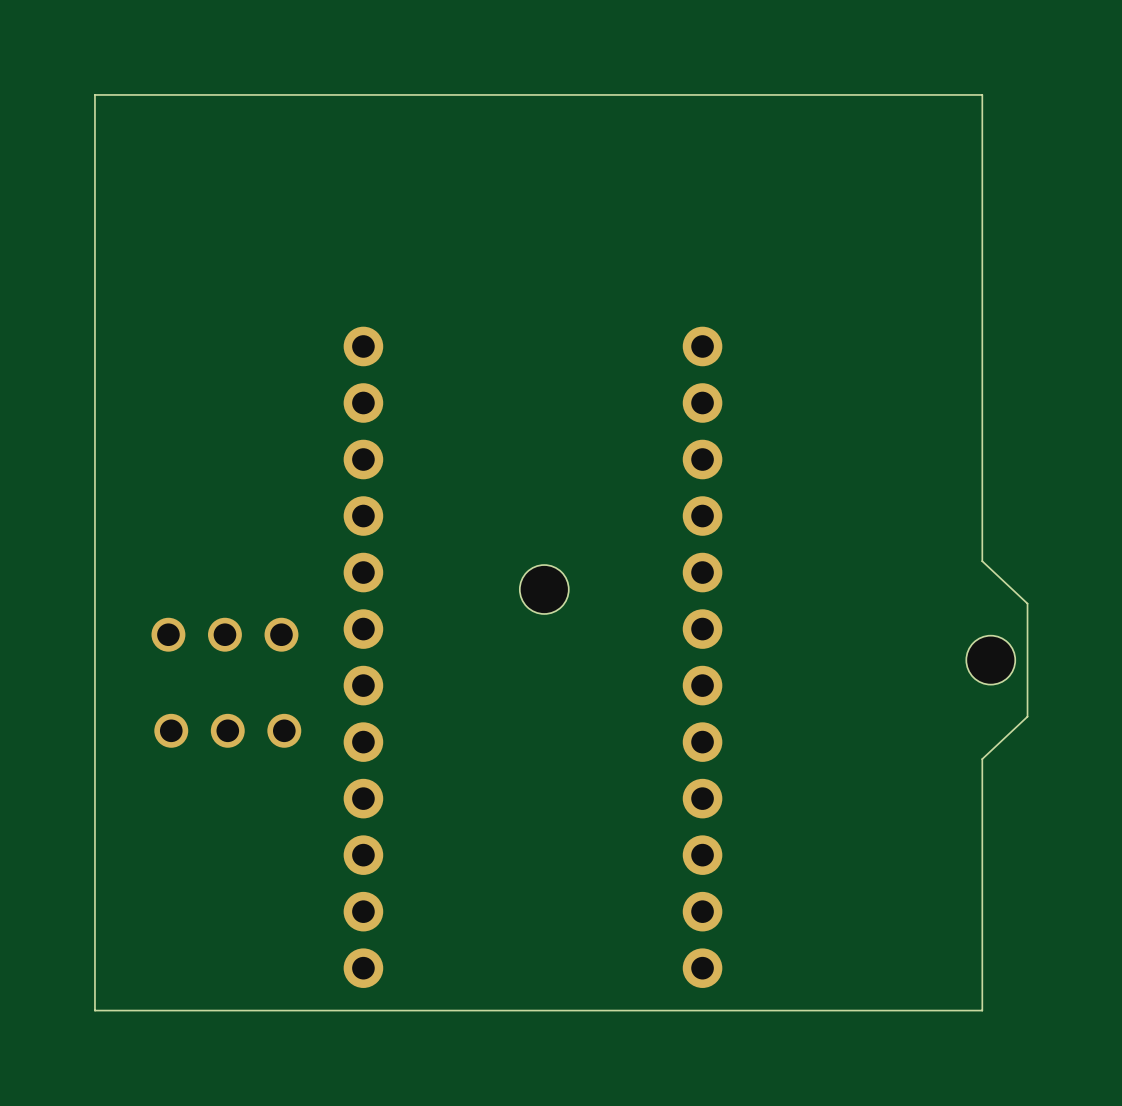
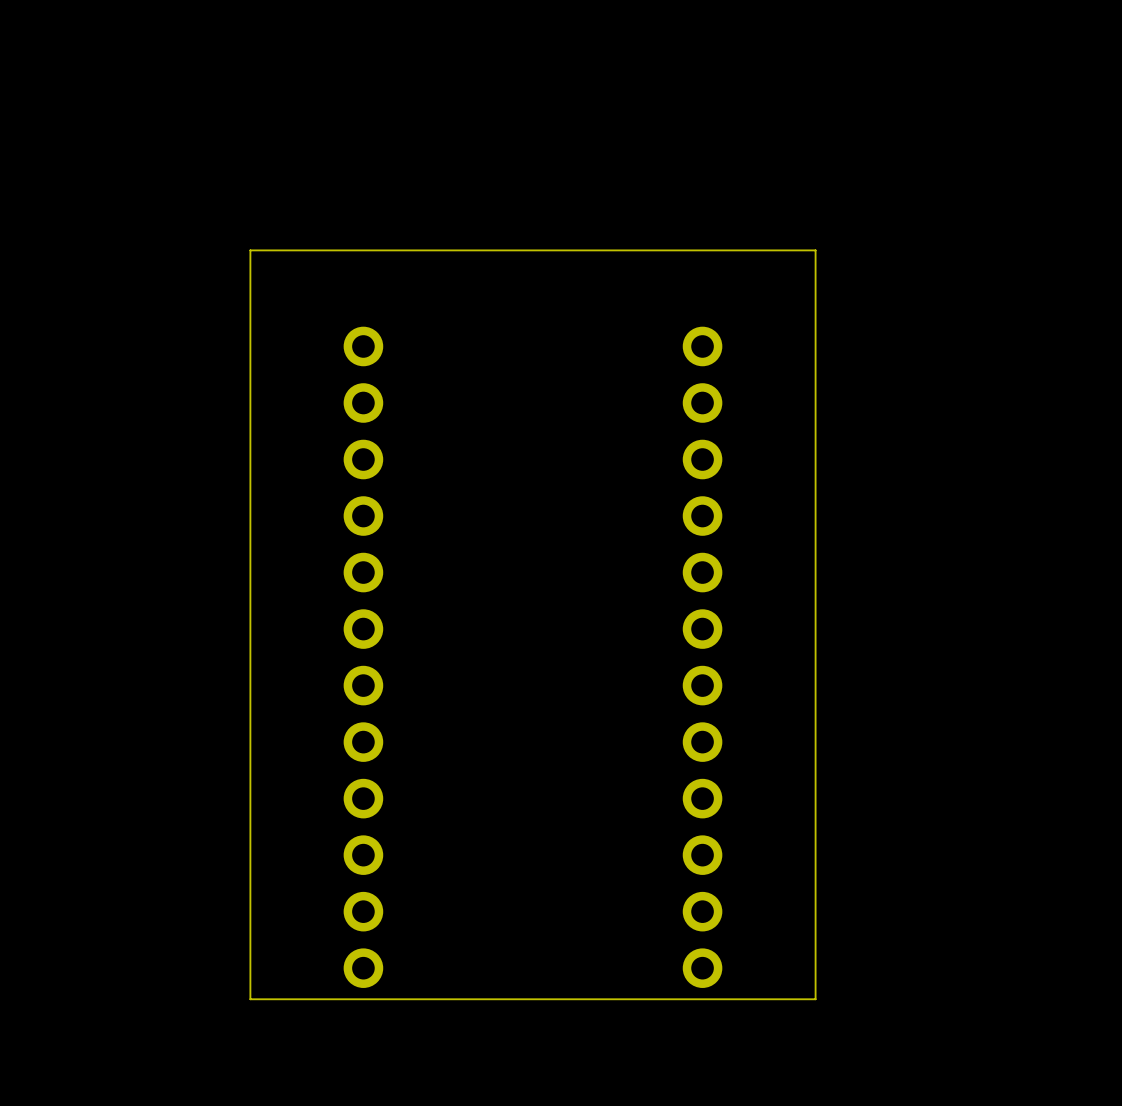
board edge: (982, 94) (94, 94) (94, 1010) (982, 1010) (982, 759) (1027, 716) (1027, 603) (982, 561) (982, 94) -> none
board edge: none -> (815, 250) (250, 250) (250, 999) (815, 999) (815, 250)
hole: (544, 589) -> none
part: (224, 634) -> none
hole: (990, 660) -> none
part: (227, 730) -> none

